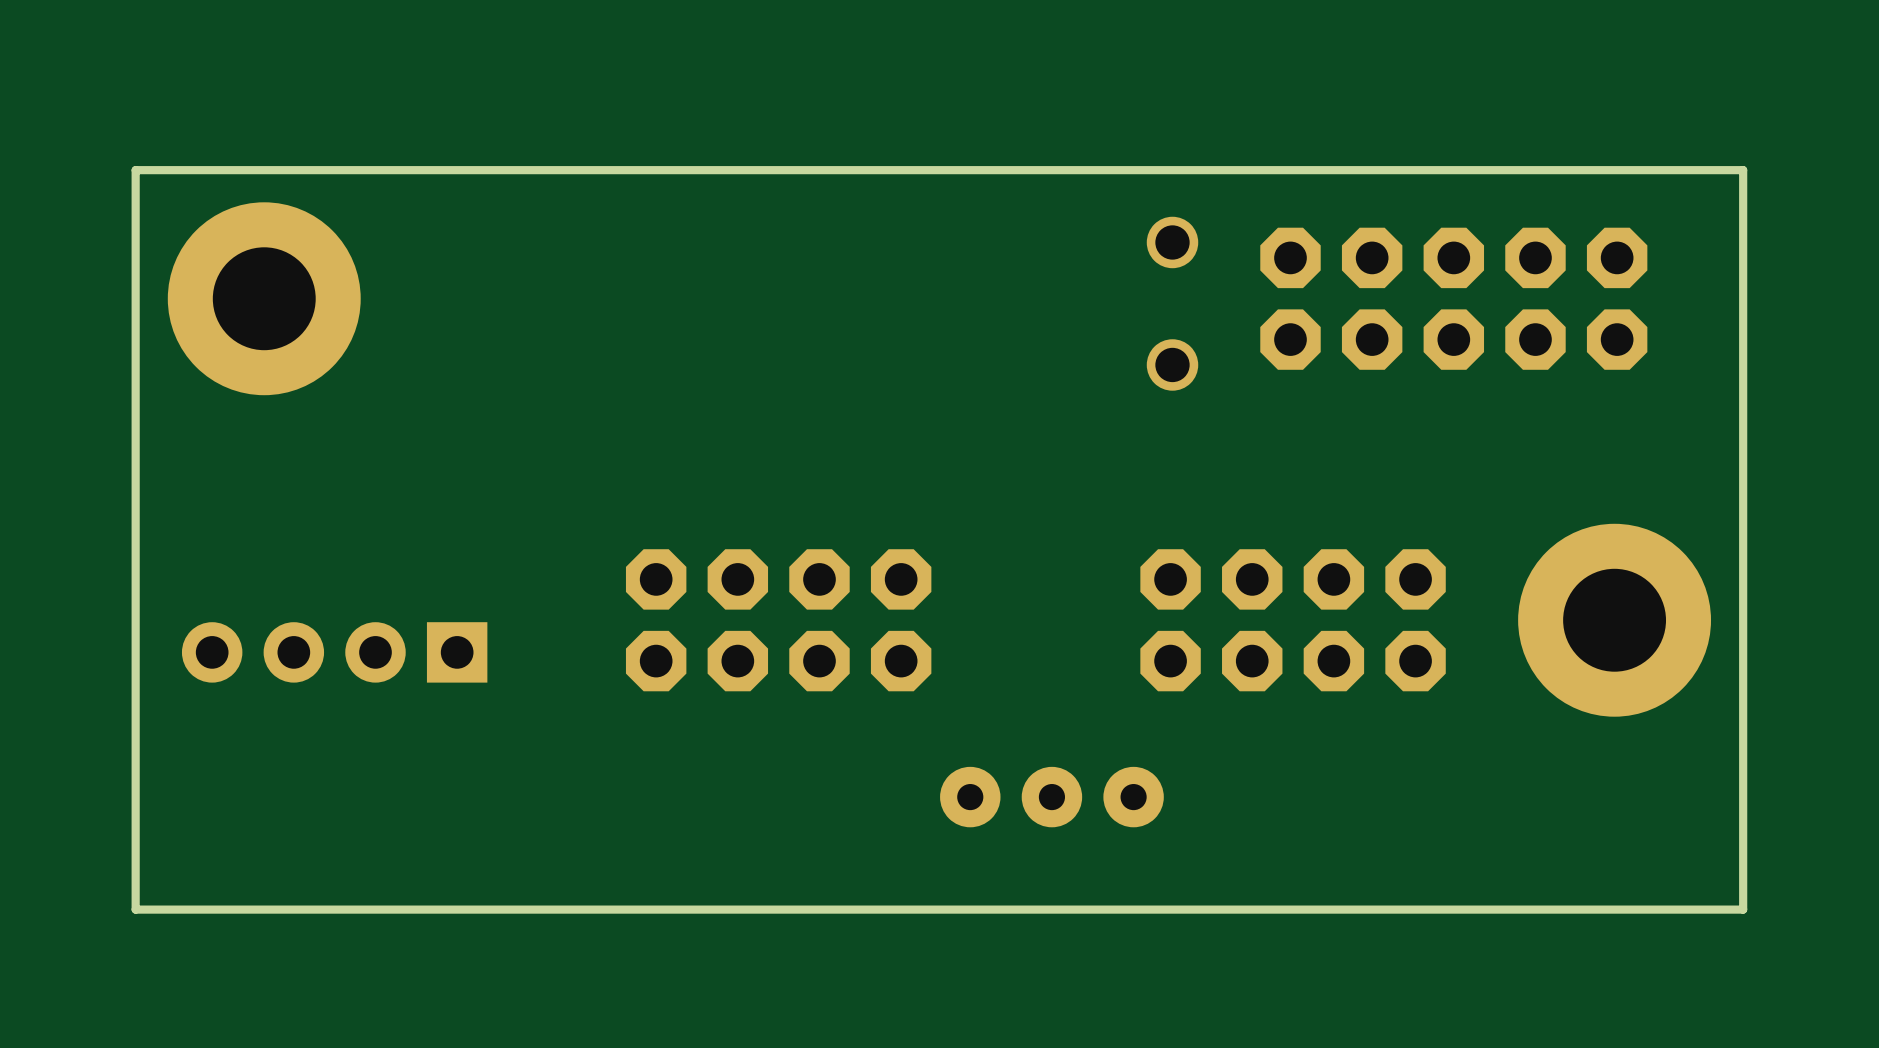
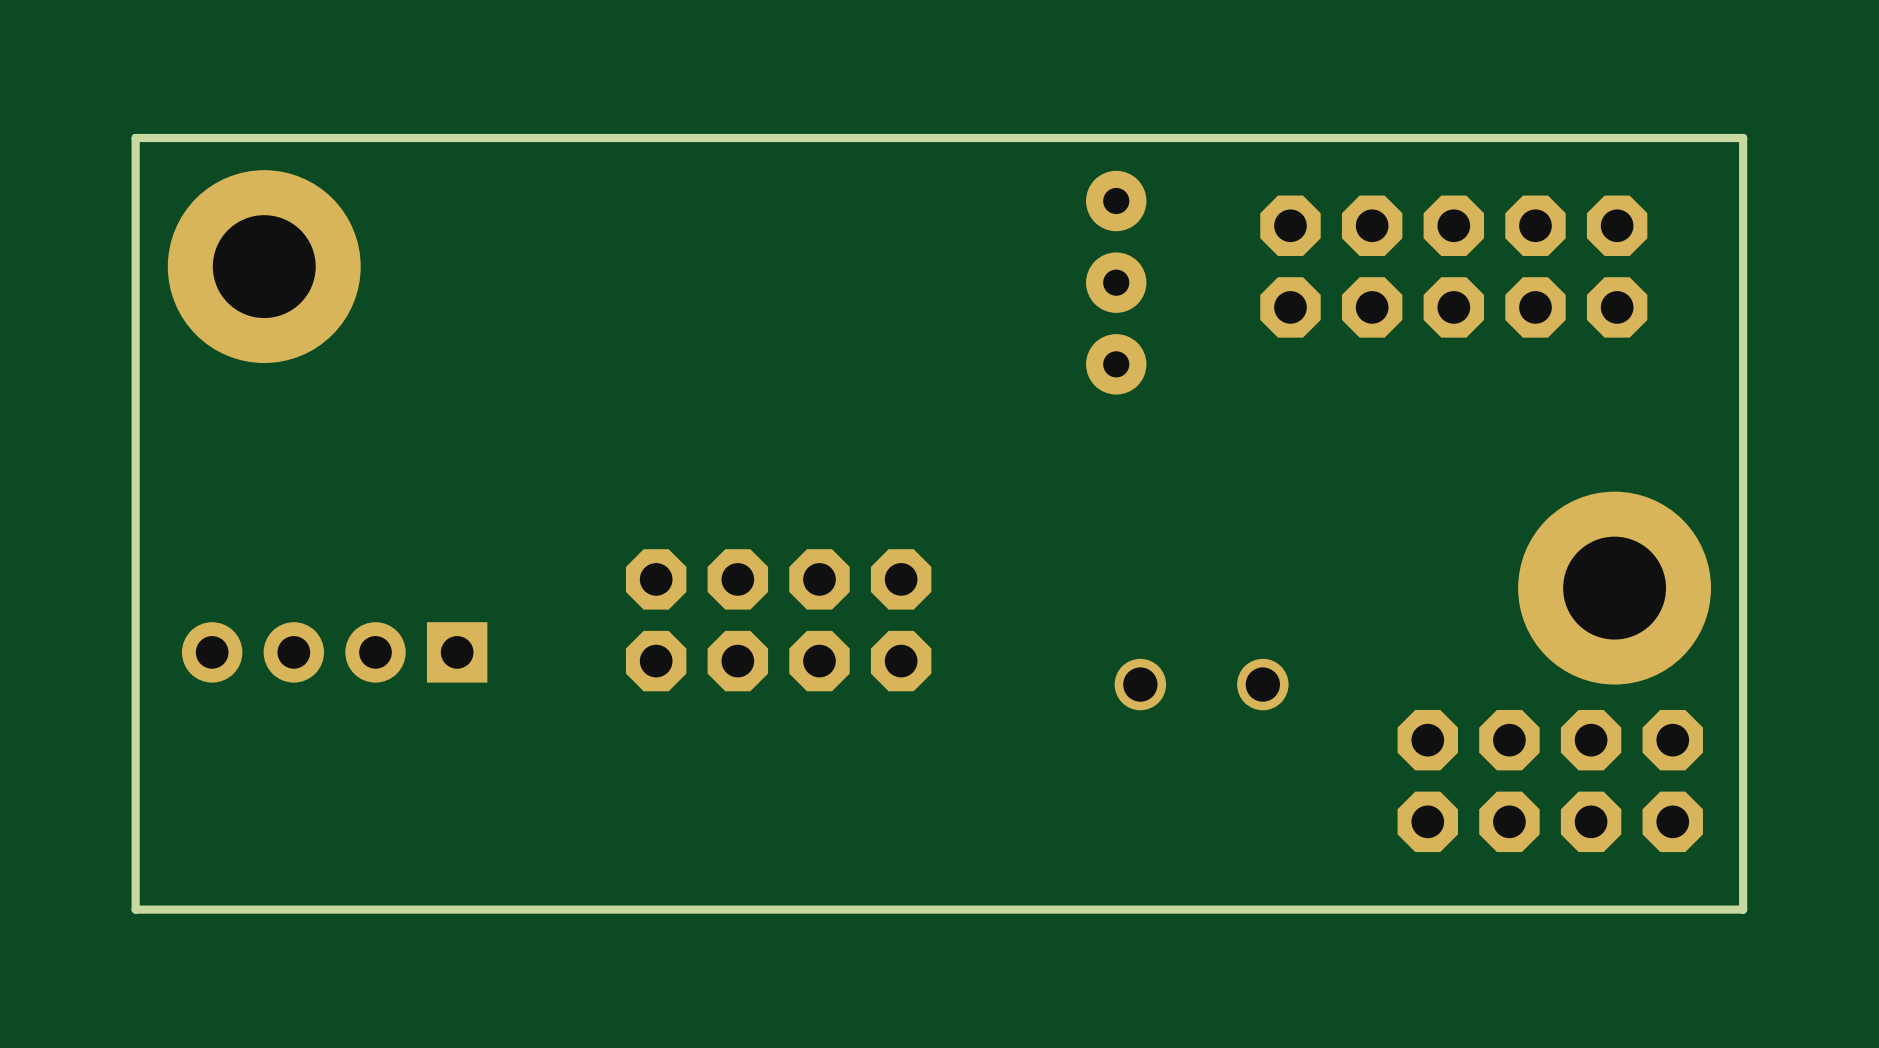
board edge: (1743, 170) (135, 170) -> (1743, 170) (1743, 137) (135, 137) (135, 170)
part position: (264, 298) -> (264, 266)
part position: (1453, 298) -> (1453, 266)
part rotation: 0° (1172, 303) -> 90° clockwise (1201, 684)
part position: (1172, 303) -> (1201, 684)
part position: (1293, 620) -> (1550, 781)
part position: (1614, 620) -> (1614, 588)
part rotation: 0° (1051, 797) -> 90° clockwise (1116, 282)
part position: (1051, 797) -> (1116, 282)

